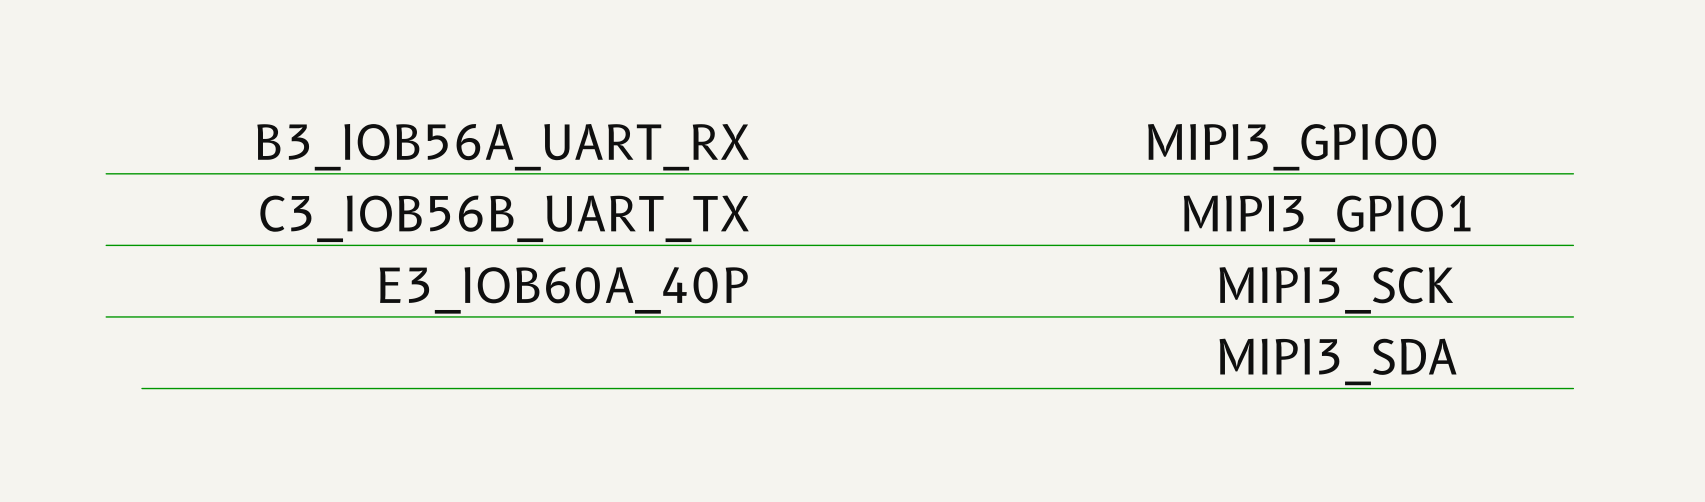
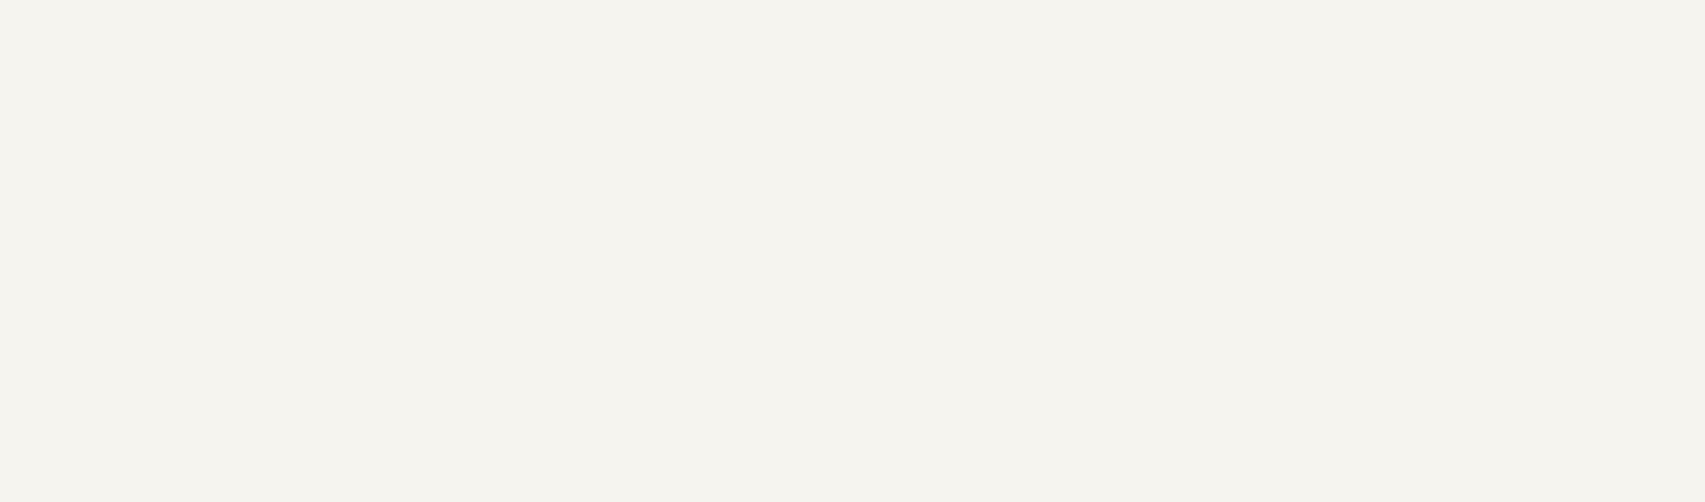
label: B3_IOB56A_UART_RX (503, 147) -> none
label: MIPI3_GPIO0 (1292, 147) -> none
wire: (106, 173) (1573, 173) -> none
label: C3_IOB56B_UART_TX (504, 218) -> none
label: MIPI3_GPIO1 (1327, 218) -> none
wire: (106, 245) (1573, 245) -> none
label: E3_IOB60A_40P (563, 290) -> none
label: MIPI3_SCK (1336, 290) -> none
wire: (106, 316) (1573, 316) -> none
label: MIPI3_SDA (1338, 361) -> none
wire: (141, 388) (1573, 388) -> none

